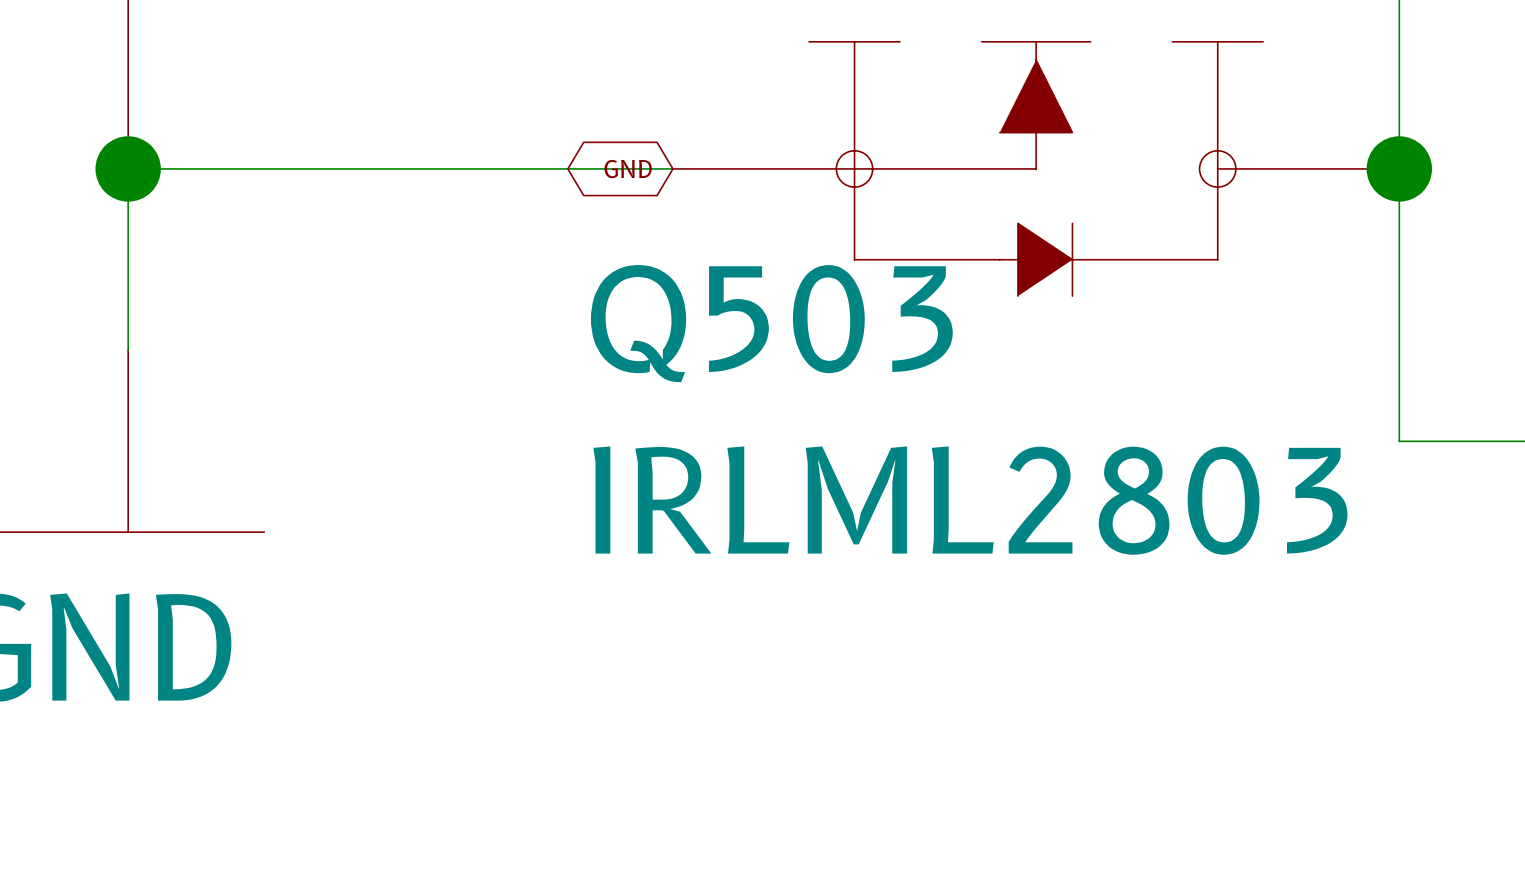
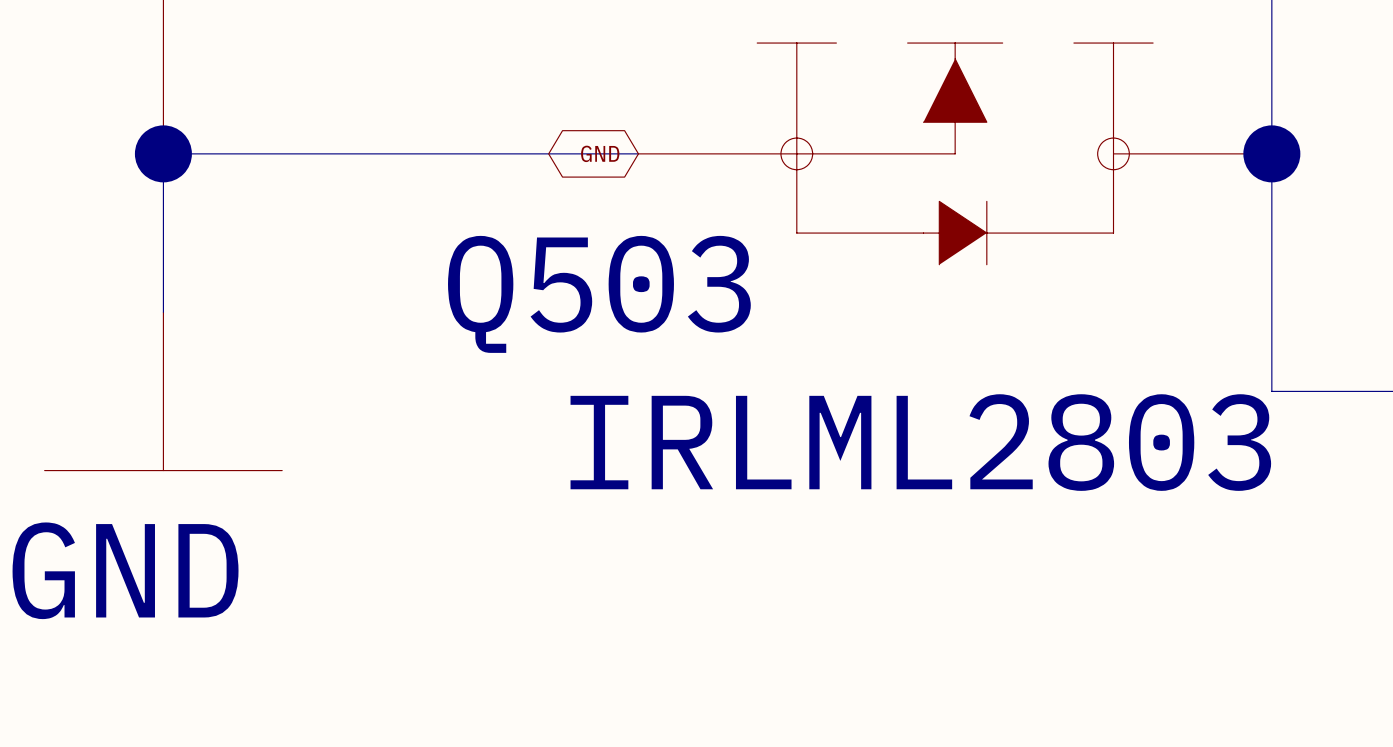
Q503 name position: Q503 (771, 323) -> Q503 (599, 294)

